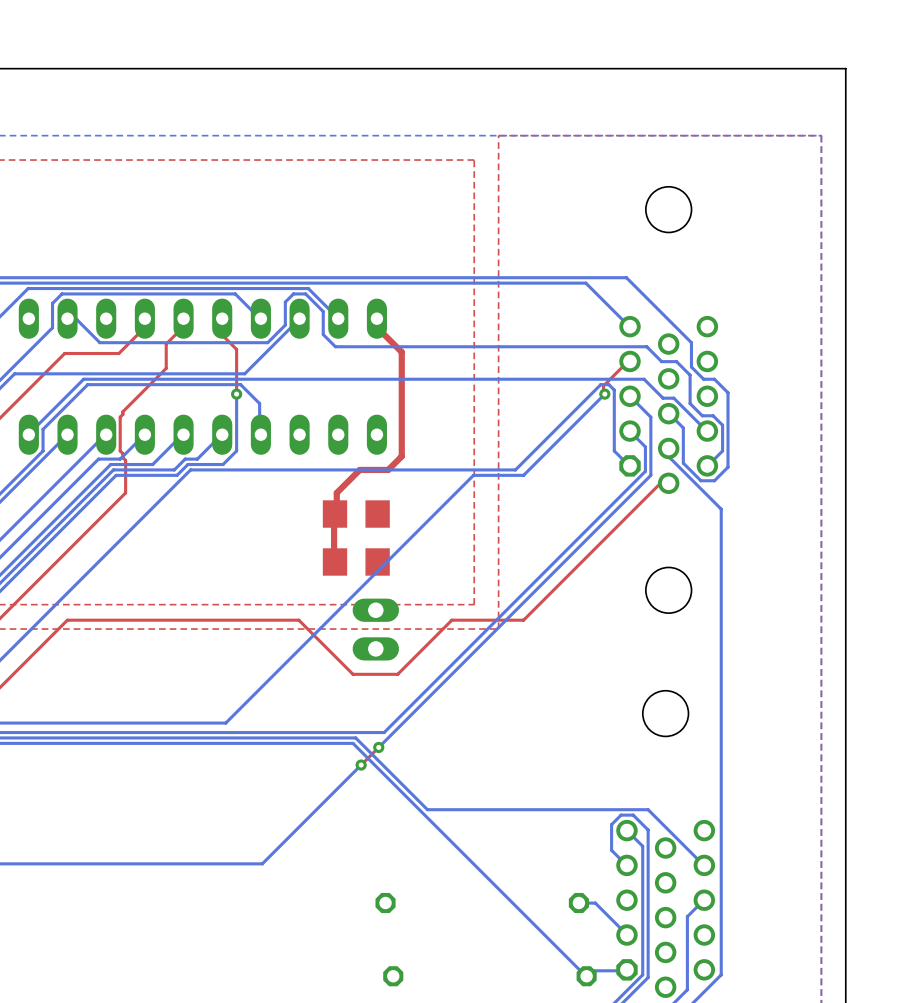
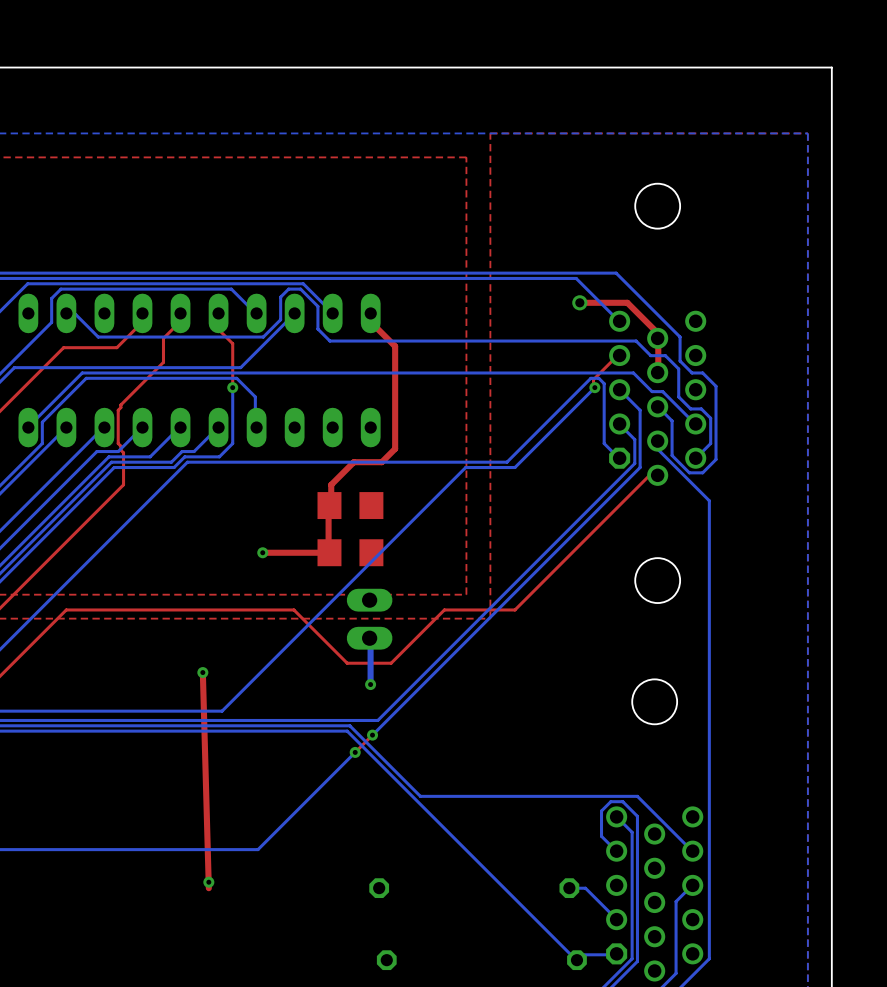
top track: none -> (579, 302) (627, 302) (655, 331) (655, 336) (658, 338) (657, 372)
via: none -> (579, 302)
via: none -> (262, 552)
top track: none -> (328, 552) (262, 552)
bottom track: none -> (370, 636) (370, 684)
top track: none -> (202, 672) (208, 888)
via: none -> (202, 672)
via: none -> (370, 684)
via: none -> (208, 882)

